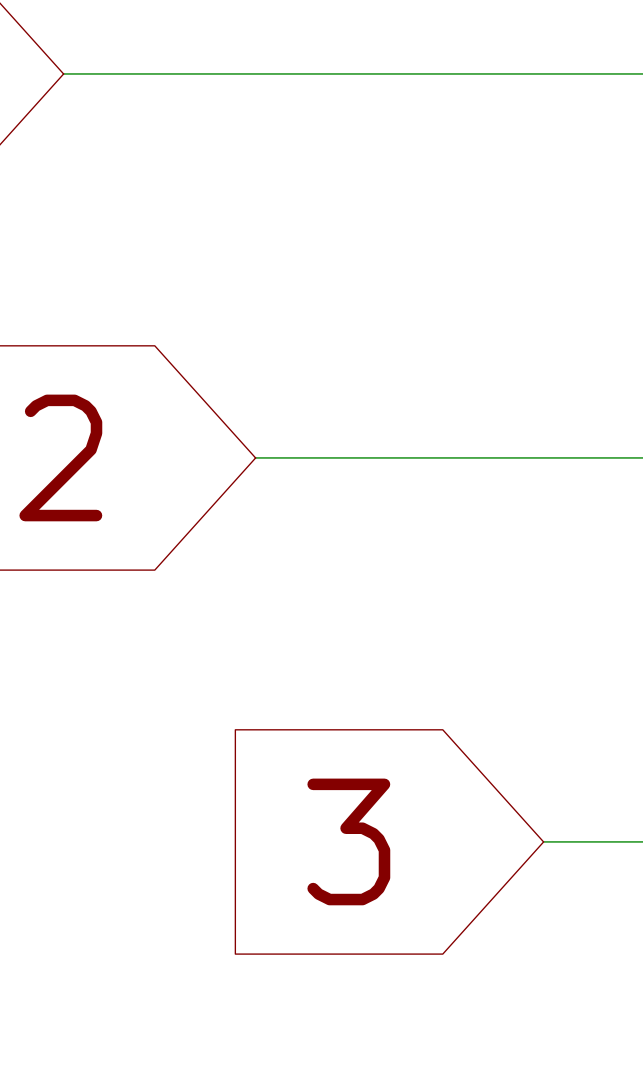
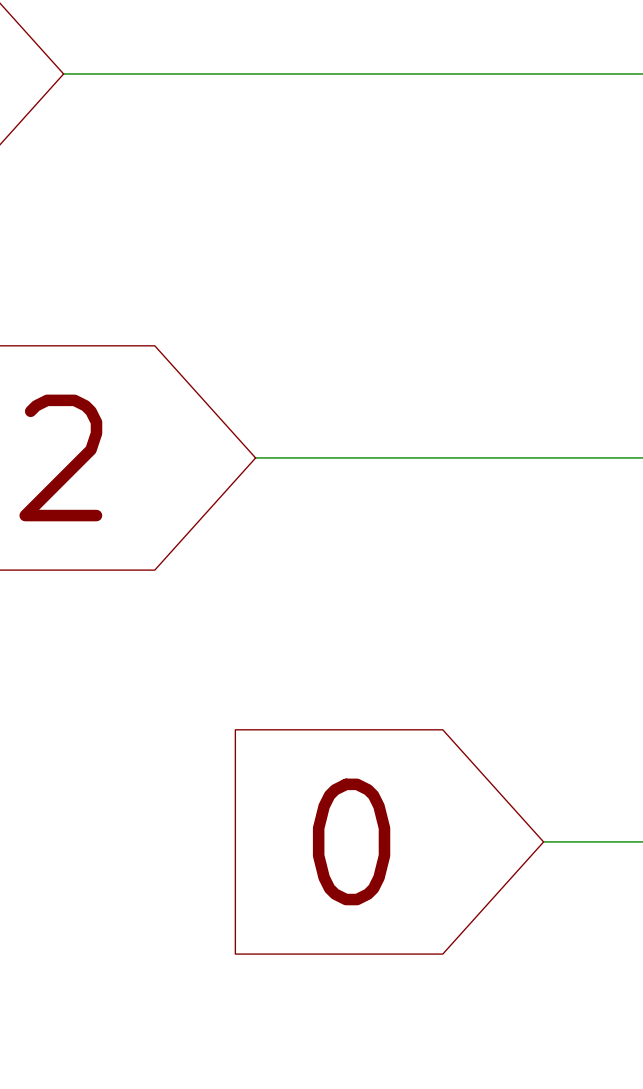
global label: 3 (348, 841) -> 0 (351, 841)

